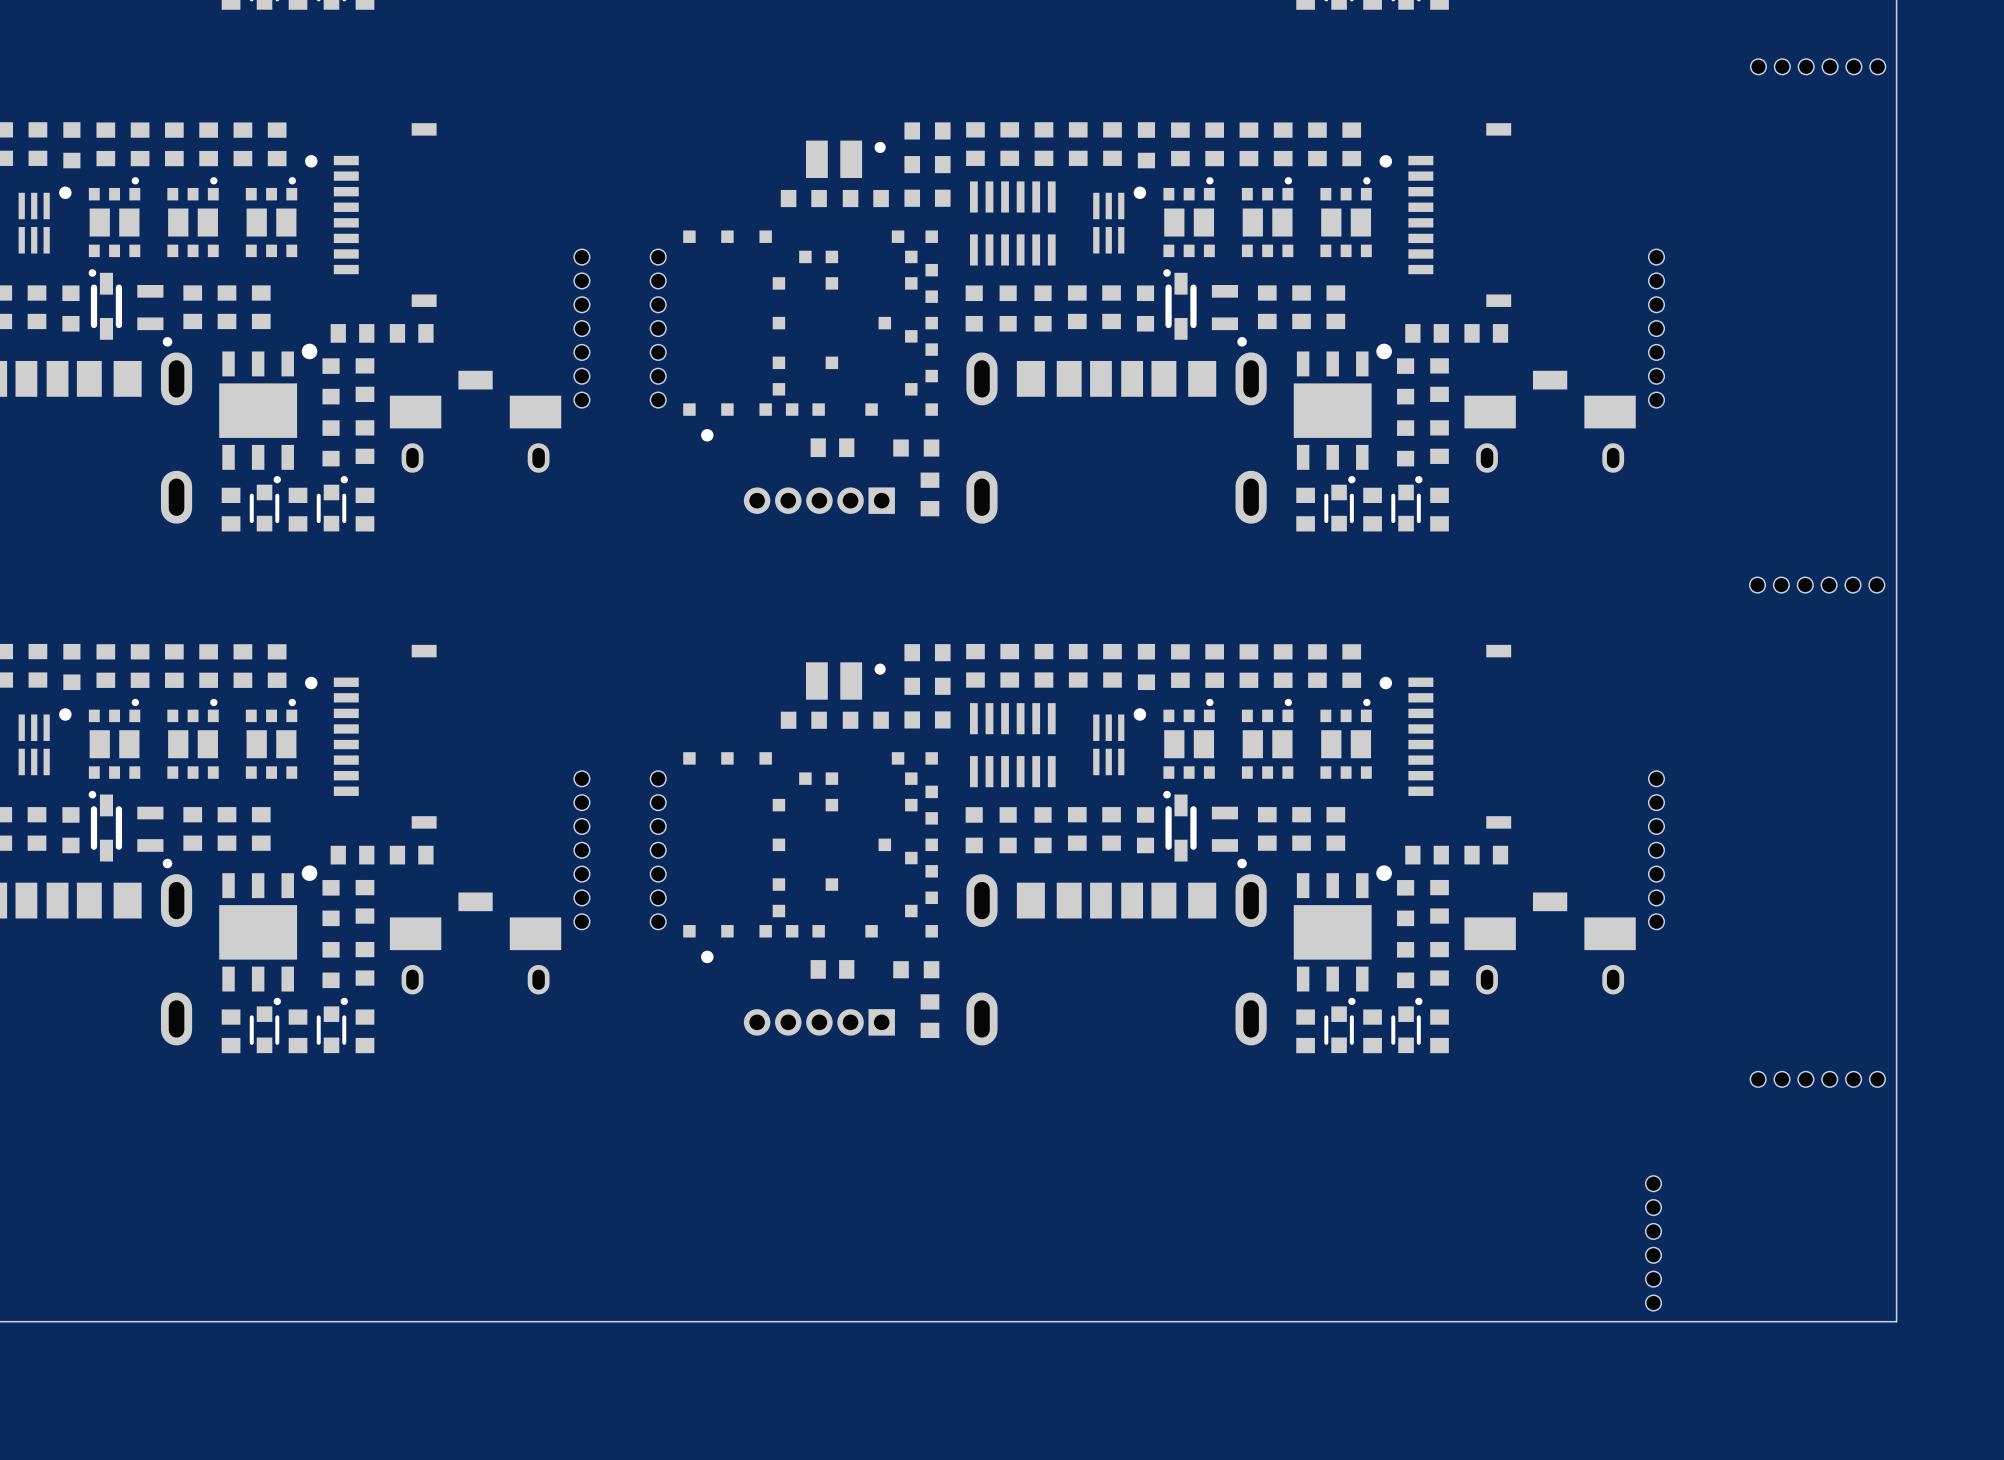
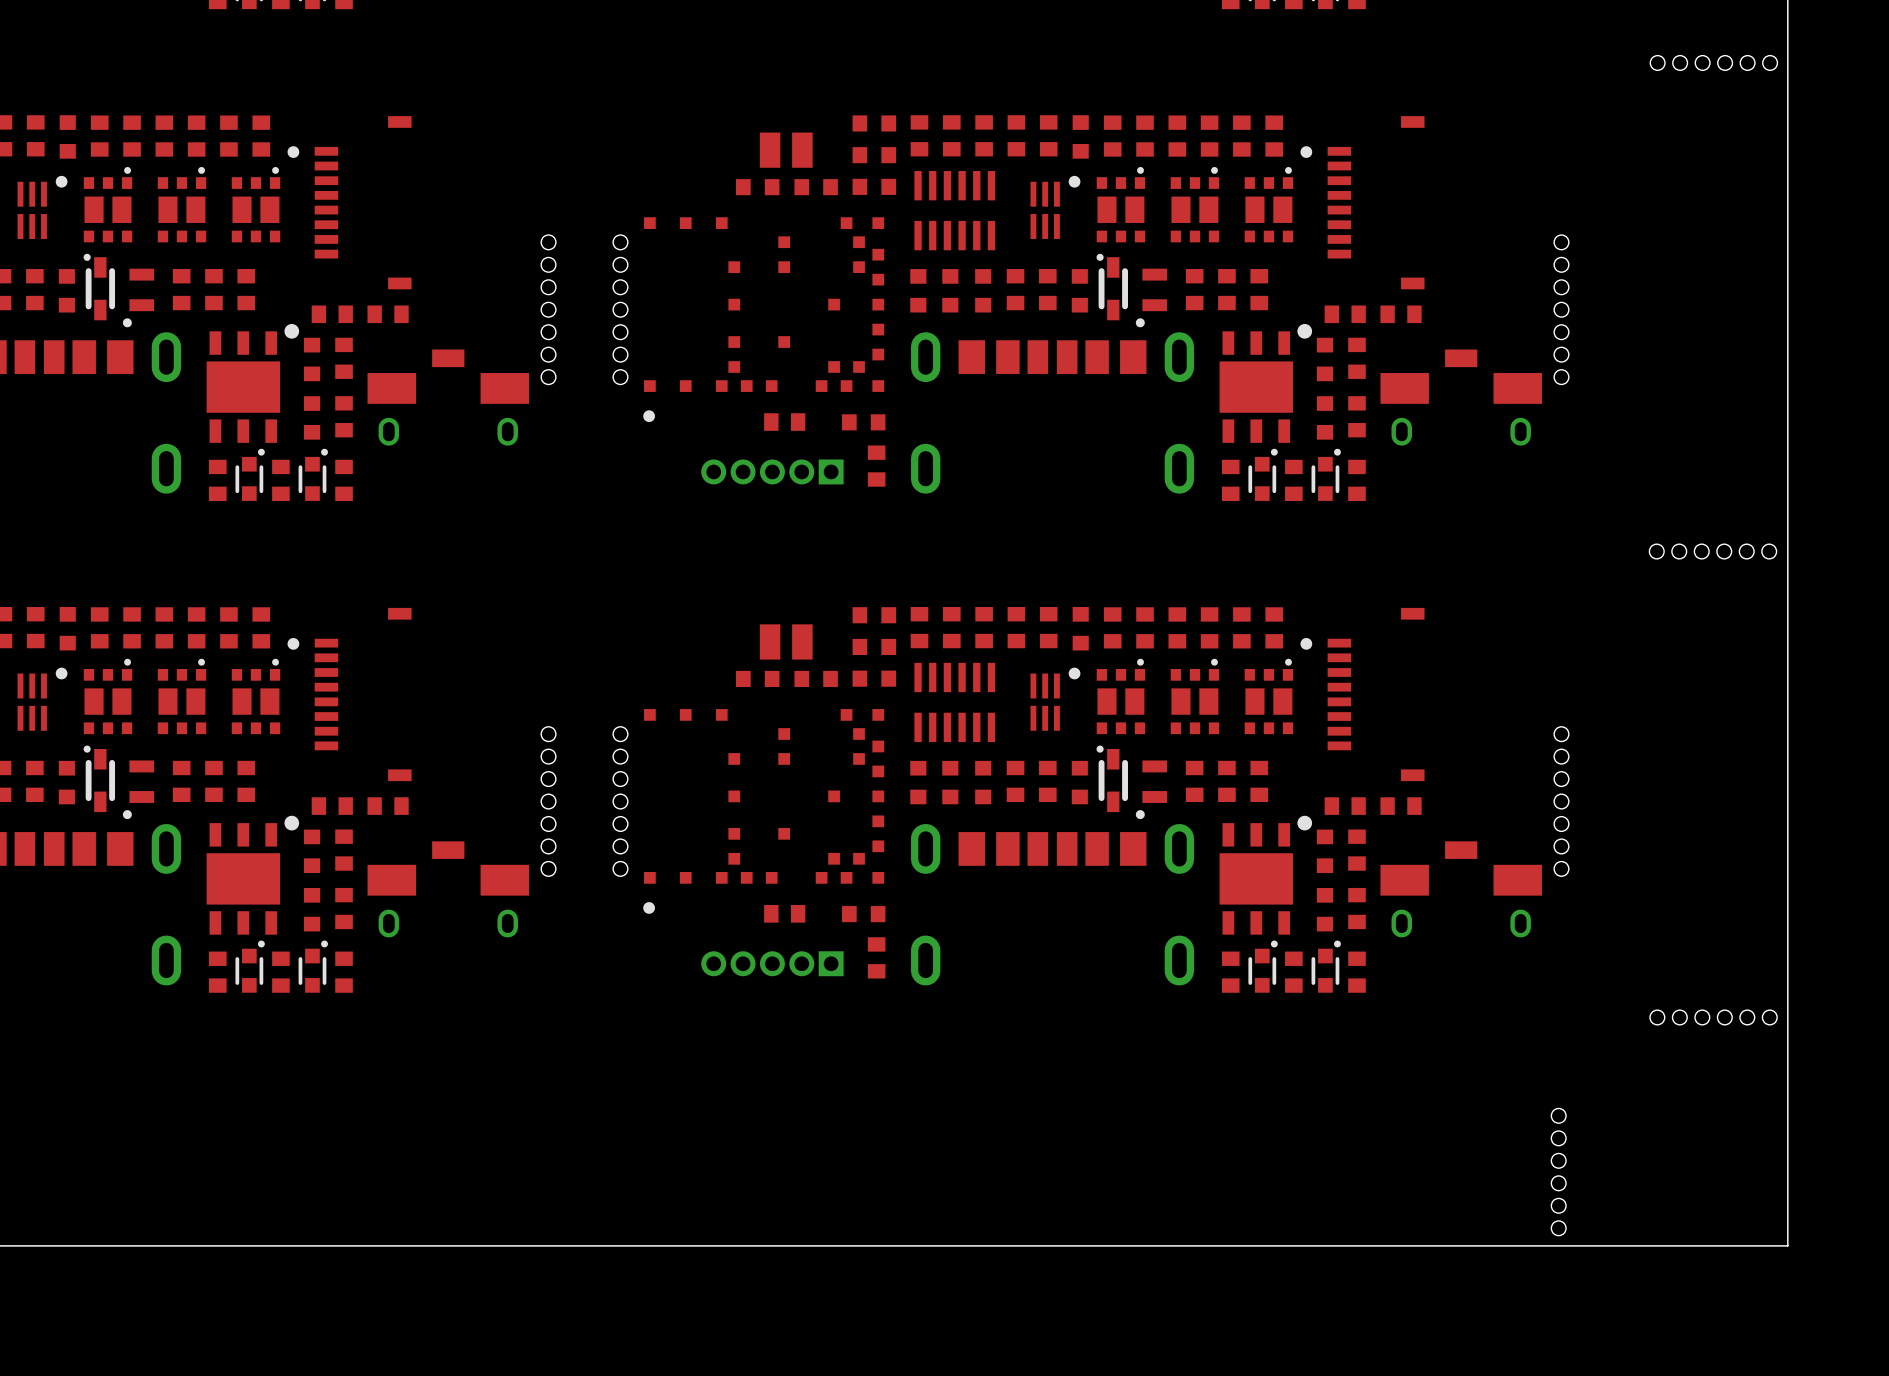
part footprint: [806, 140, 886, 178] -> [759, 132, 813, 168]
part footprint: [683, 230, 938, 442] -> [643, 217, 885, 423]
part footprint: [137, 285, 173, 347] -> [122, 268, 155, 328]
part footprint: [1211, 285, 1247, 347] -> [1135, 268, 1168, 328]
part footprint: [806, 662, 886, 700] -> [759, 624, 813, 660]
part footprint: [683, 752, 938, 964] -> [643, 709, 885, 914]
part footprint: [137, 806, 173, 869] -> [122, 760, 155, 820]
part footprint: [1211, 806, 1247, 869] -> [1135, 760, 1168, 820]

